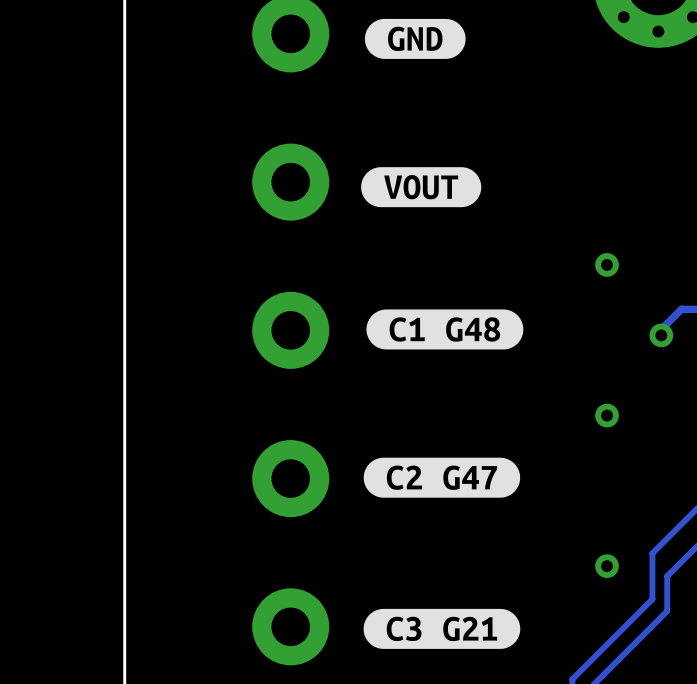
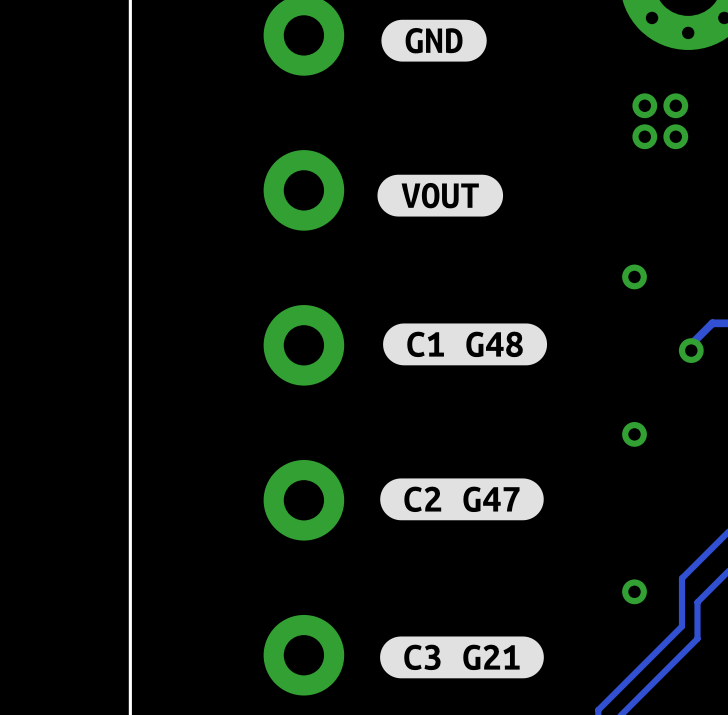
via: none -> (644, 105)
via: none -> (675, 105)
via: none -> (644, 136)
via: none -> (675, 136)

